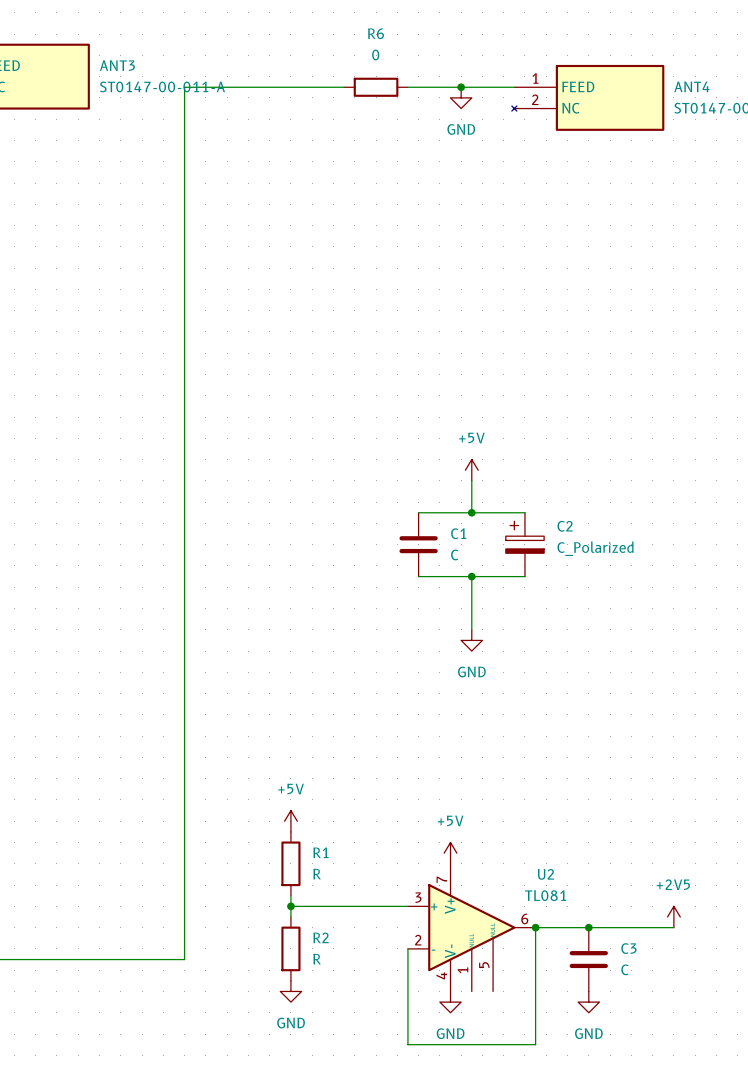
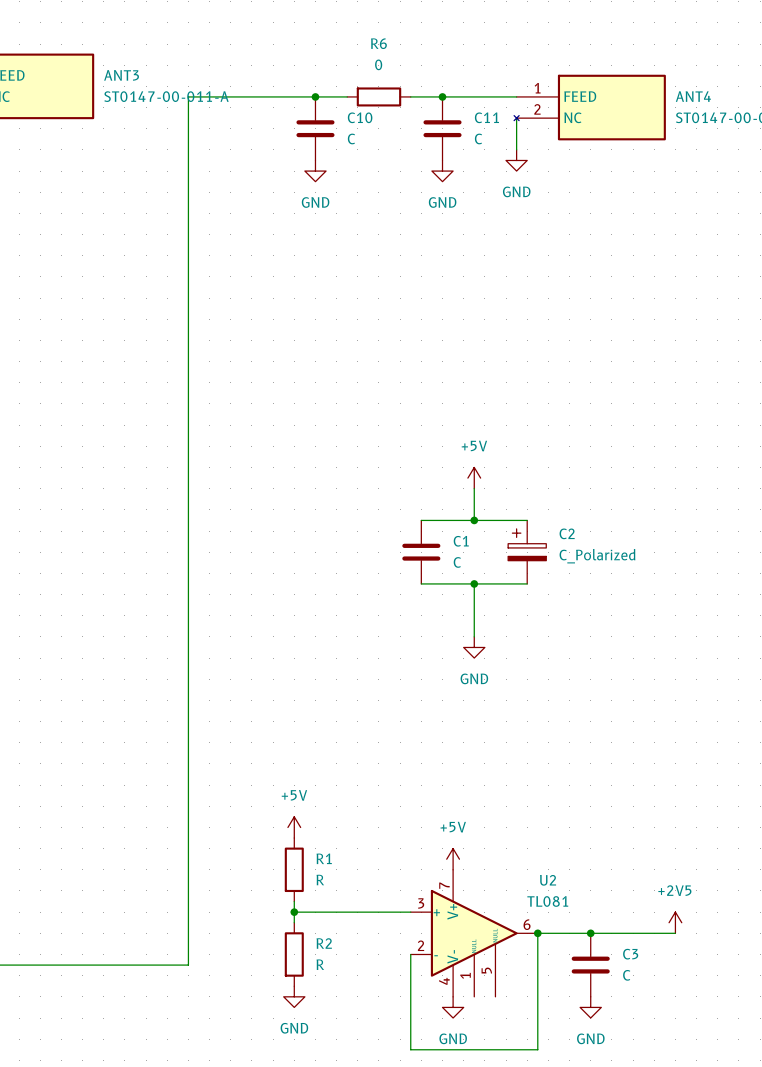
junction: none -> (315, 96)
junction position: (461, 87) -> (442, 96)
power symbol: GND (461, 97) -> none
wire: none -> (516, 118) (516, 149)
C10: none -> C (315, 128)
C11: none -> C (442, 128)
power symbol: none -> GND (516, 160)
power symbol: none -> GND (315, 171)
power symbol: none -> GND (442, 171)

